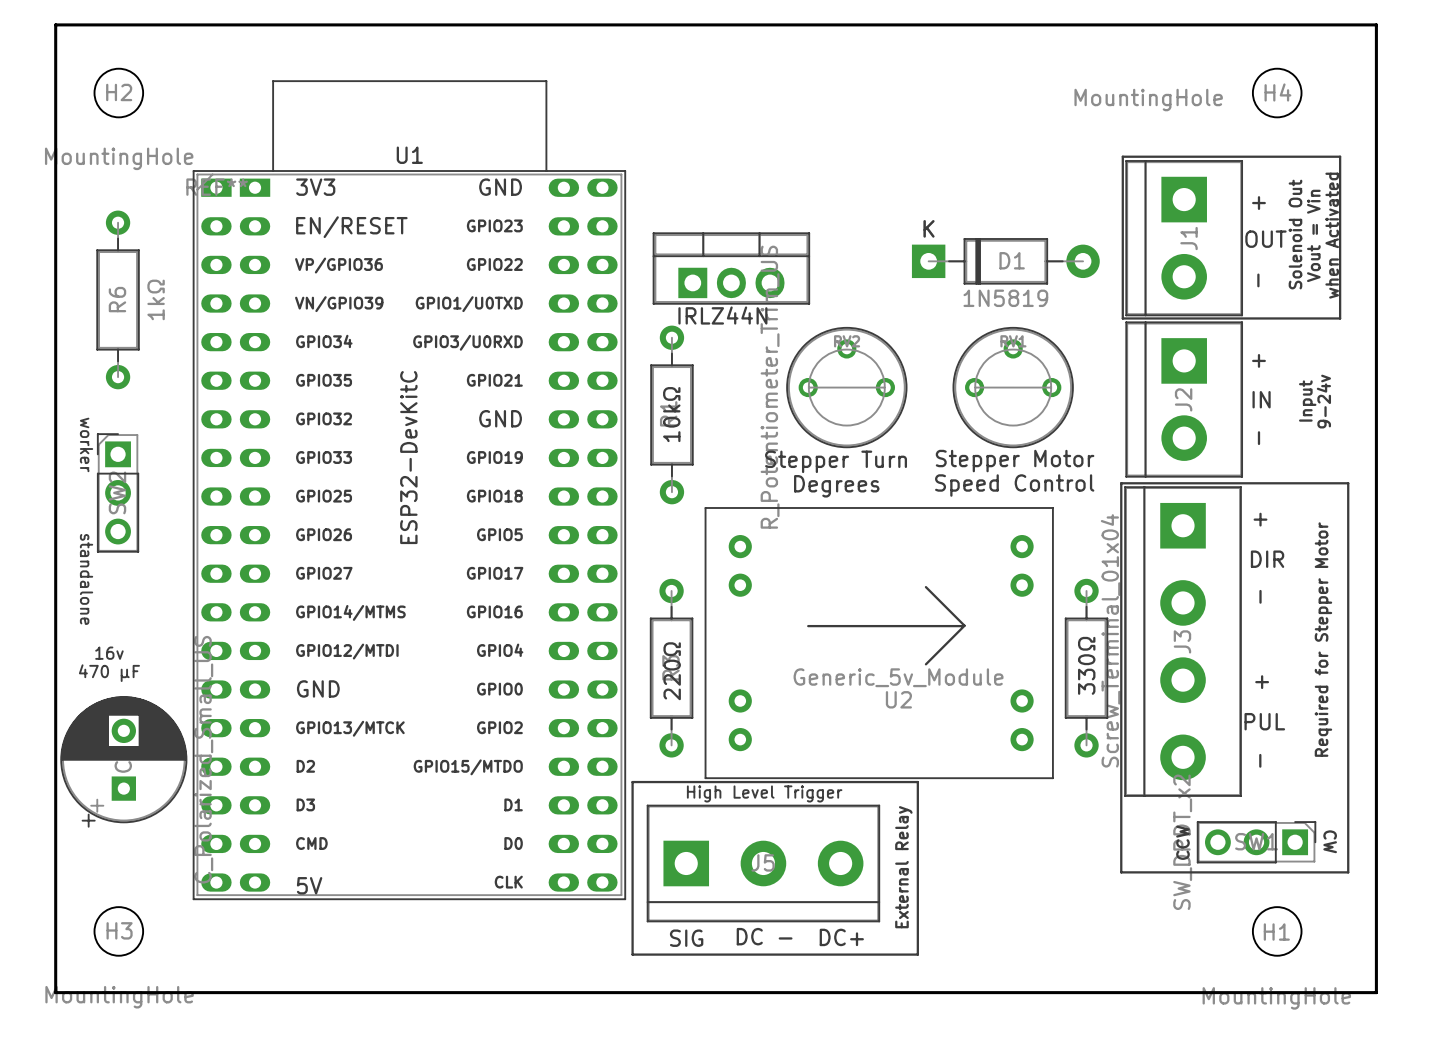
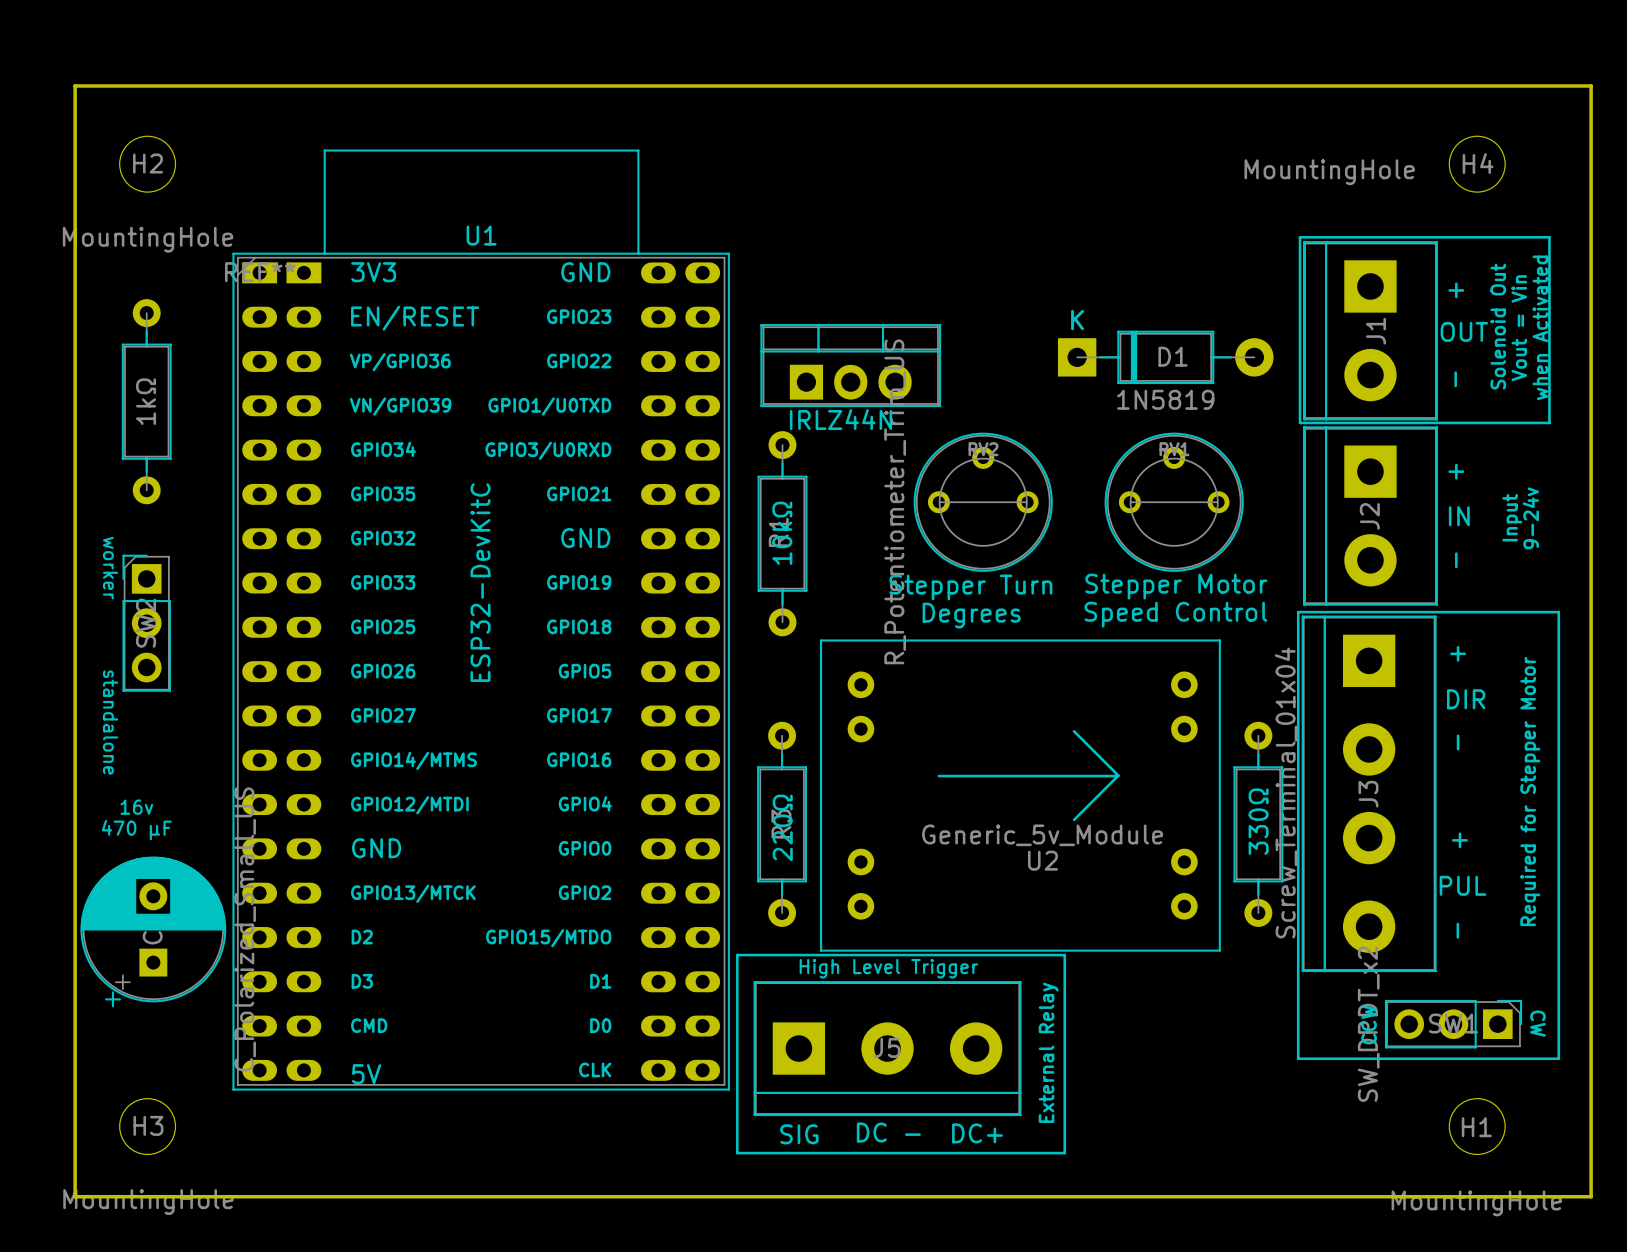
R6 text: none -> 1kΩ (146, 401)
R6 name: R6 (117, 299) -> none
R6 value: 1kΩ (156, 299) -> none

